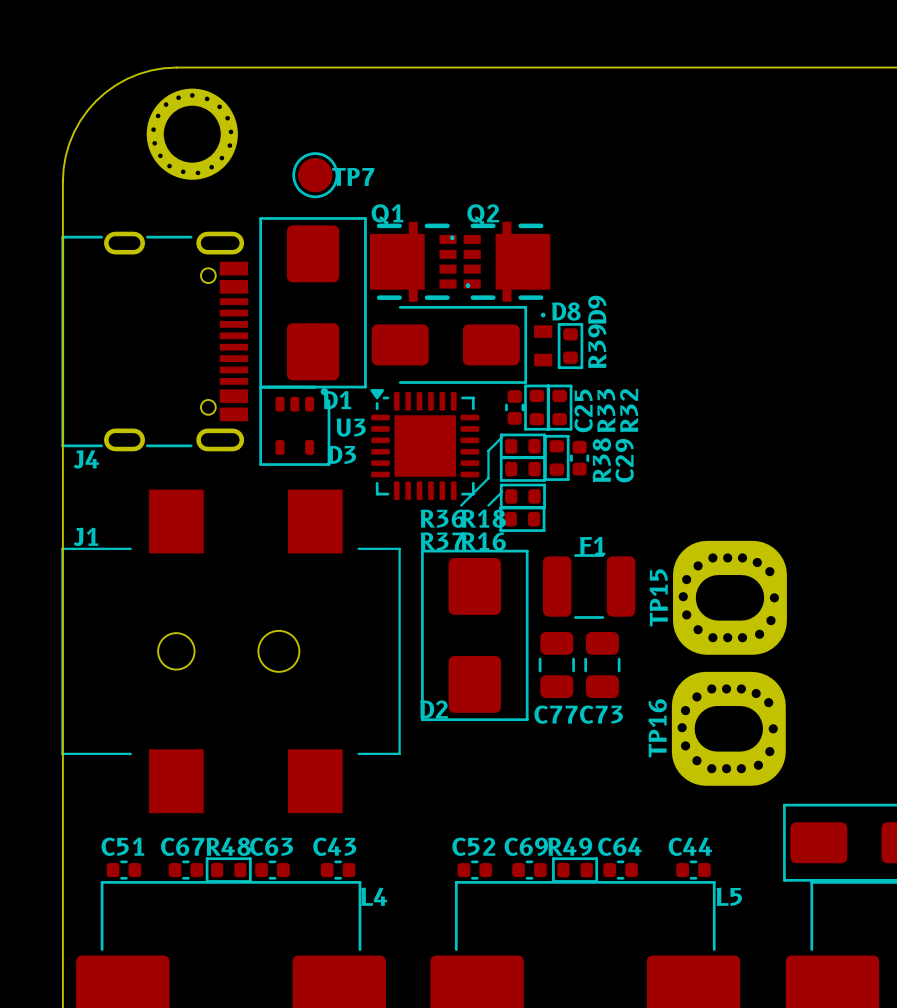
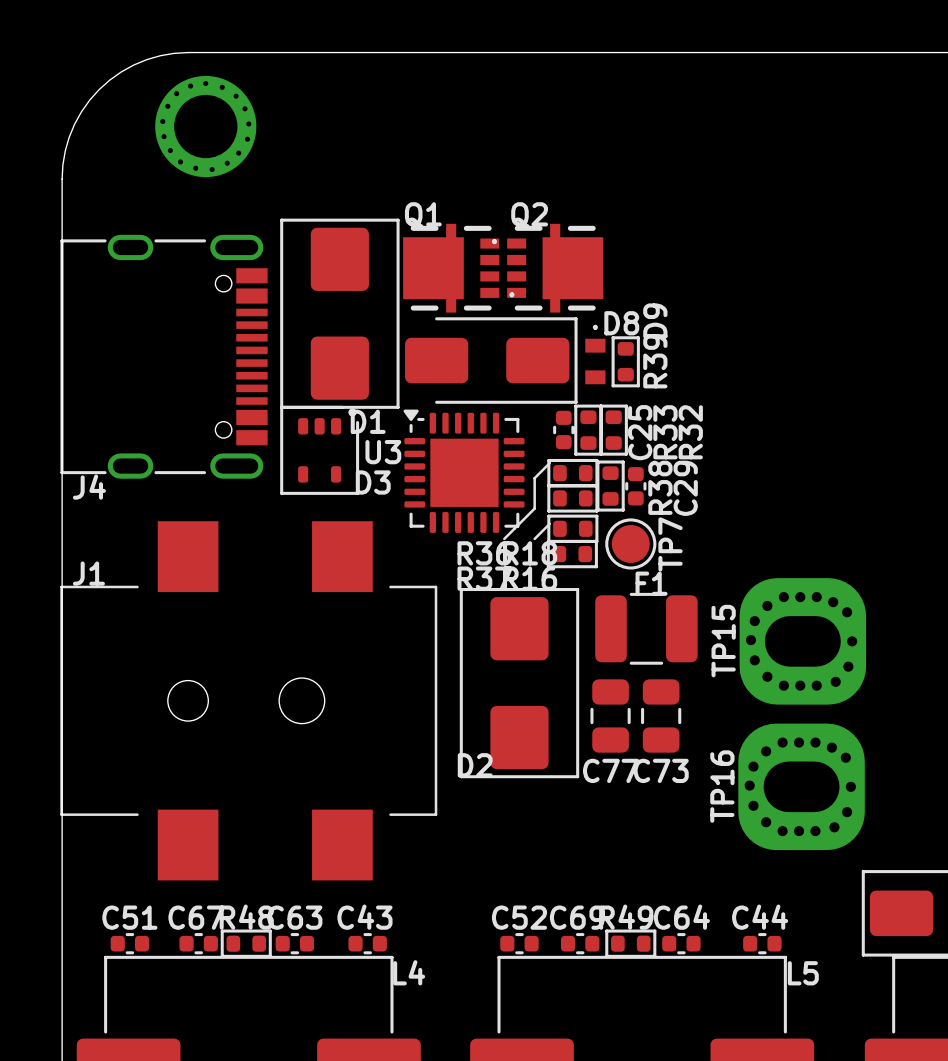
TP7 position: (315, 175) -> (630, 543)
TP7 name rotation: 0° (353, 176) -> 90° counterclockwise (670, 544)

